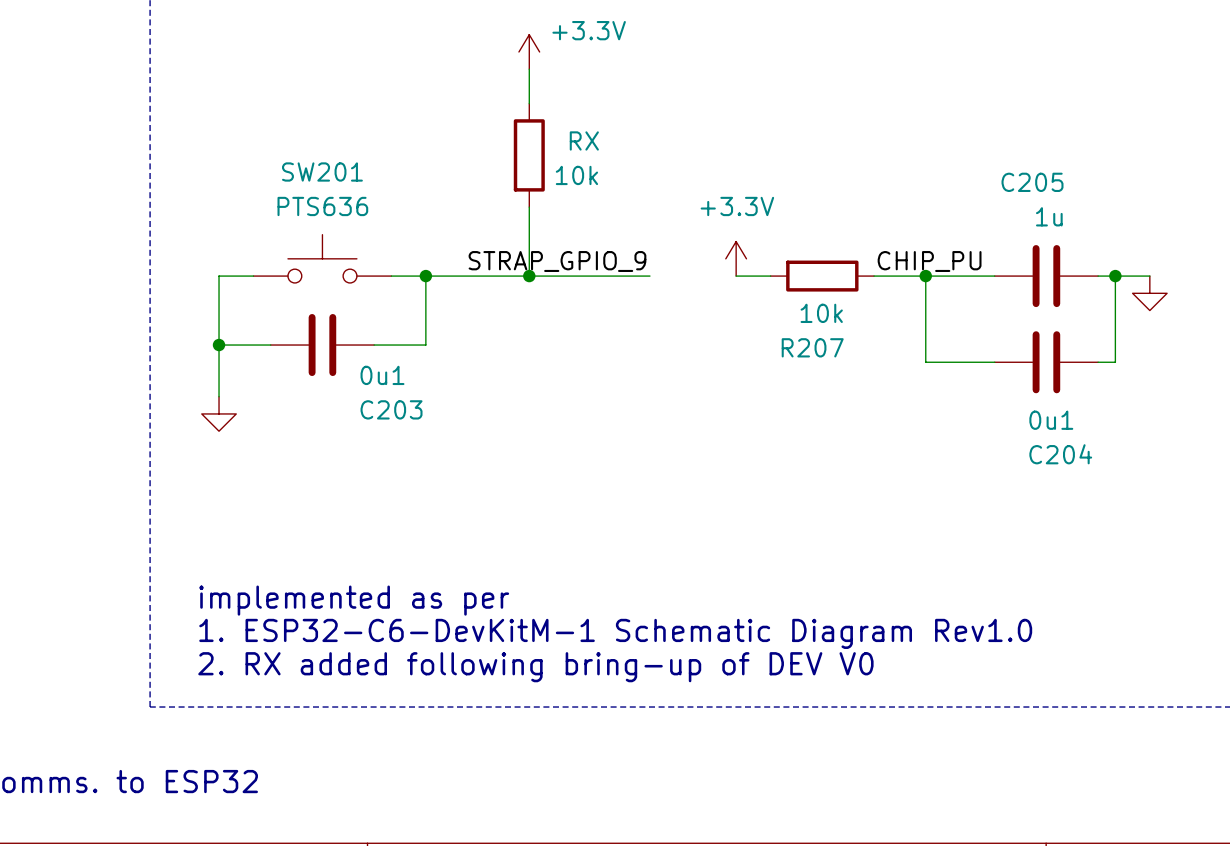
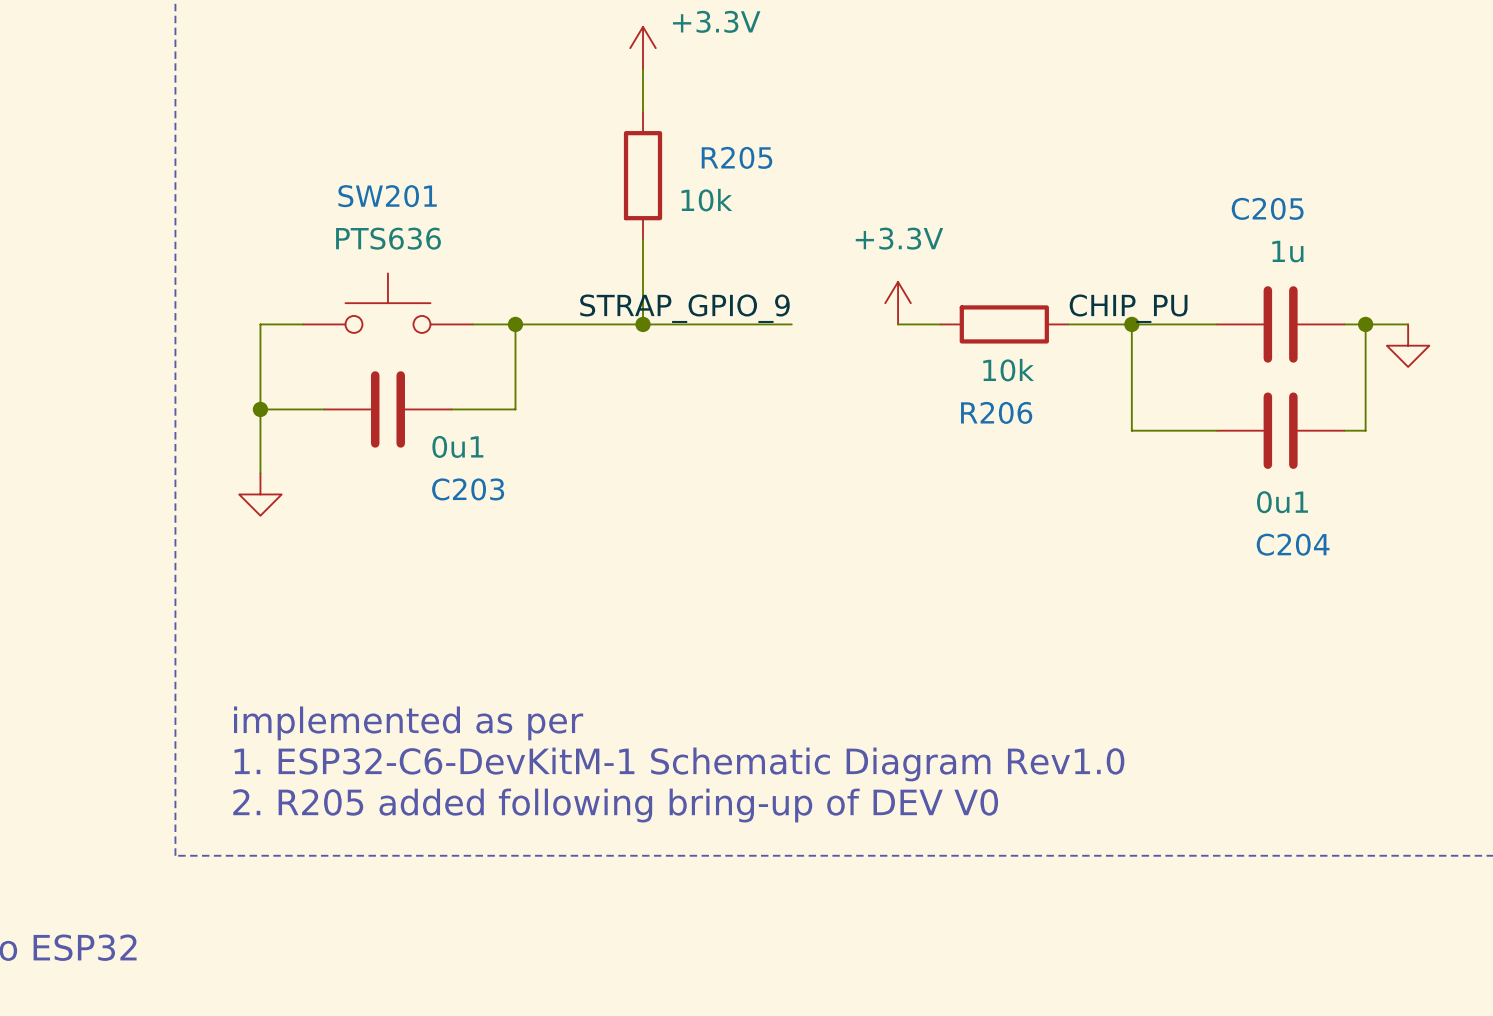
RX name: RX (584, 140) -> R205 (736, 157)
R207 name: R207 (812, 347) -> R206 (996, 412)
text: 2. RX added following bring-up of DEV V0 (535, 667) -> 2. R205 added following bring-up of DEV V0 (615, 805)

